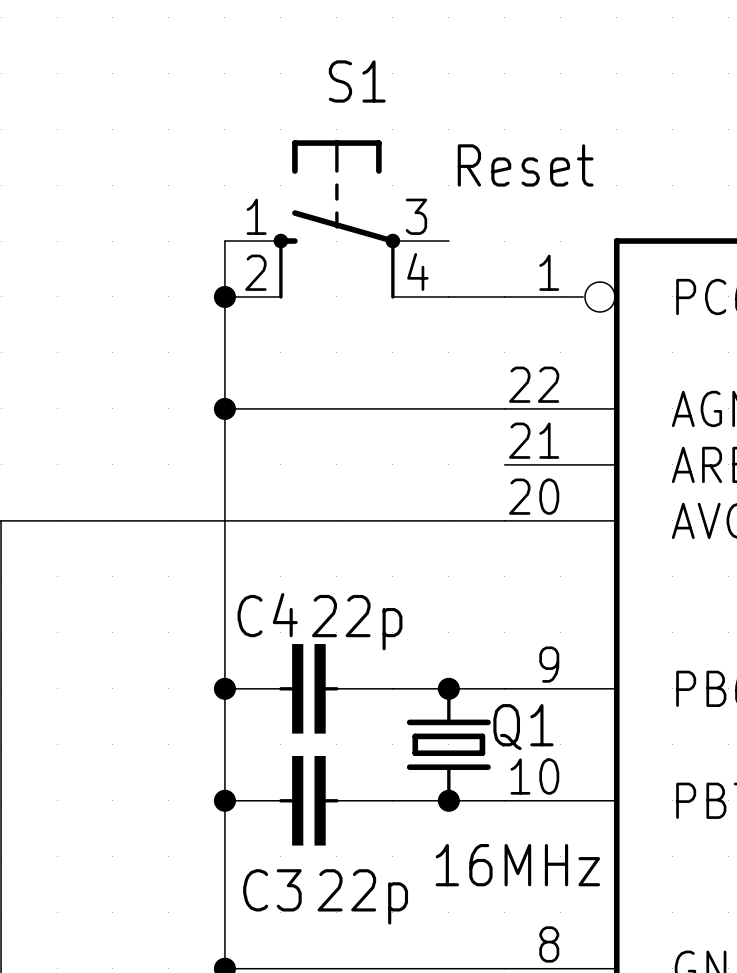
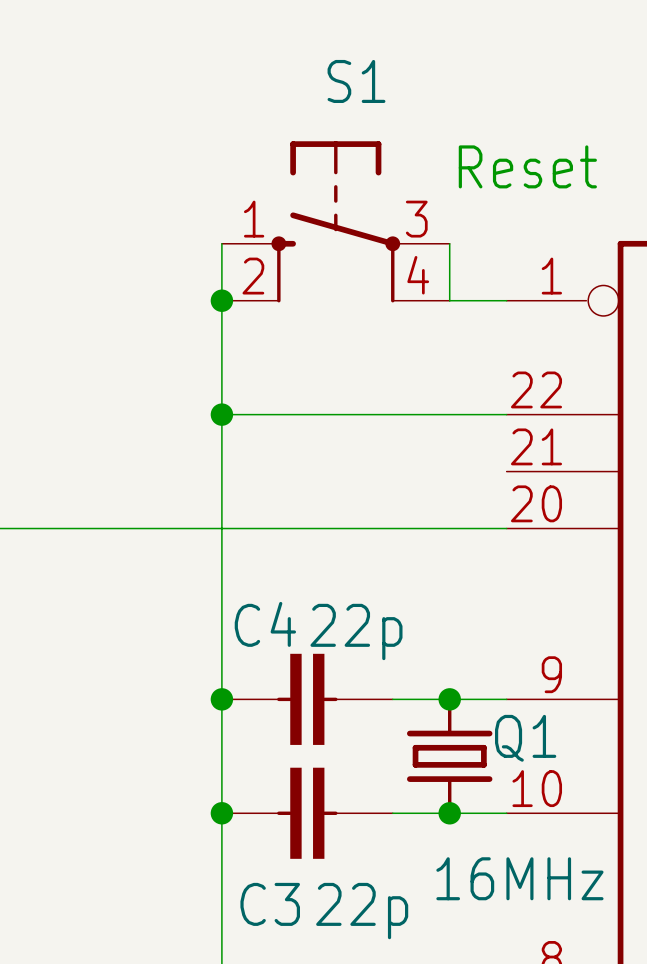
wire: none -> (449, 243) (449, 300)

